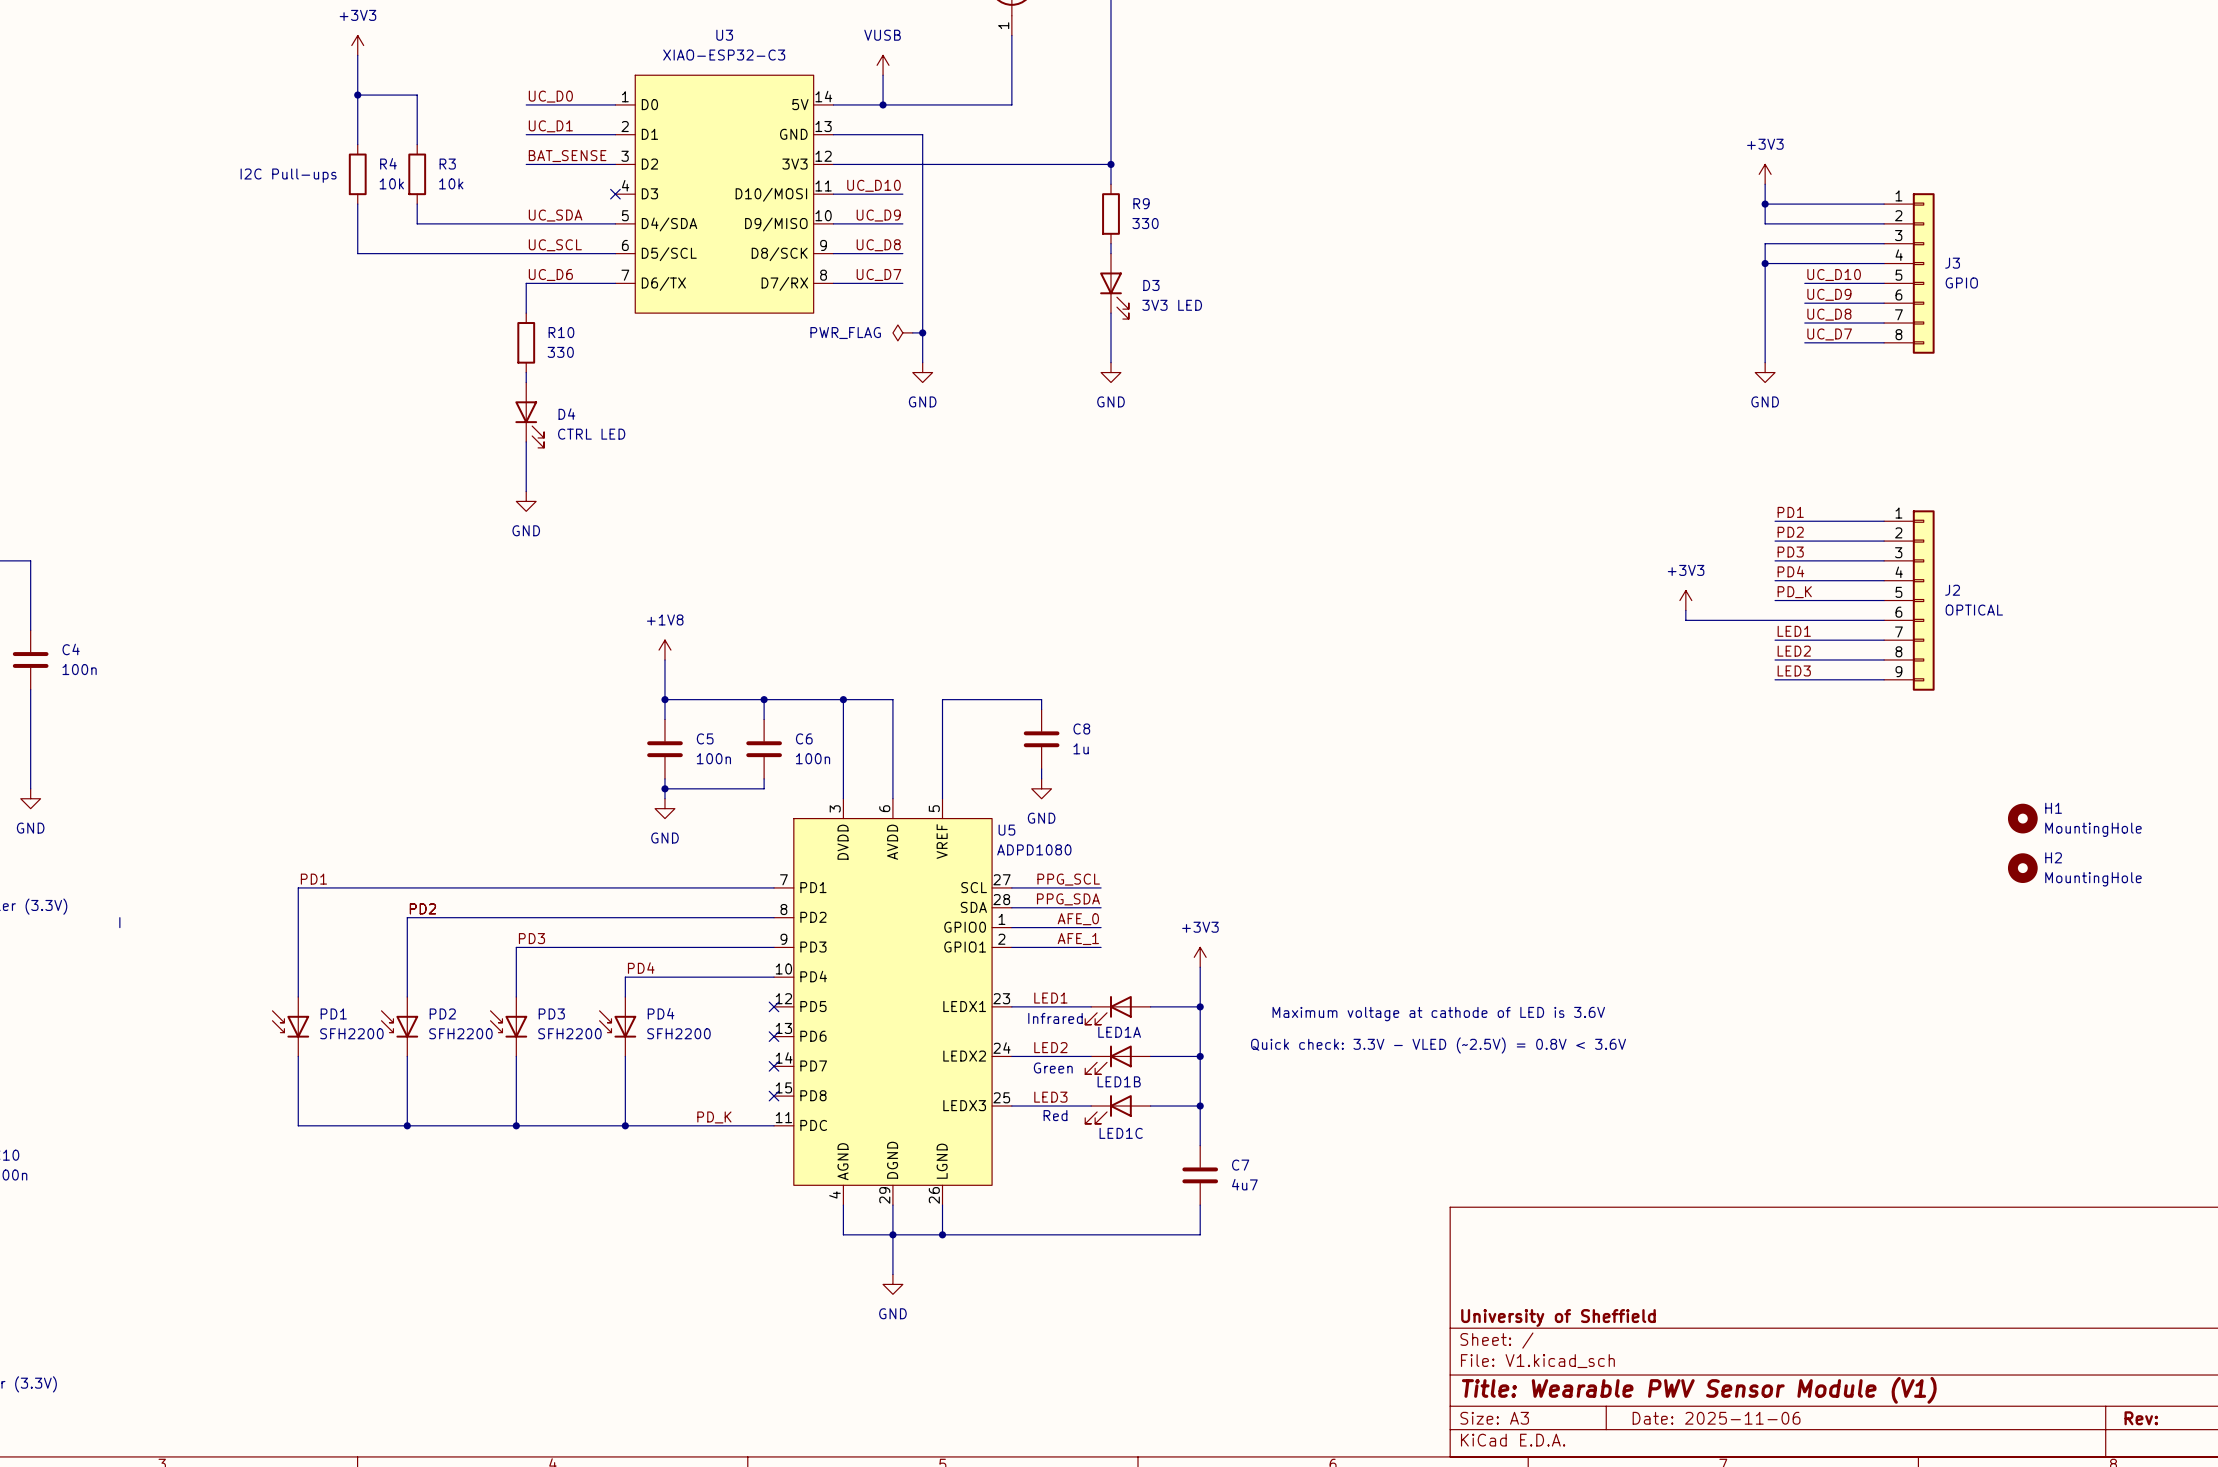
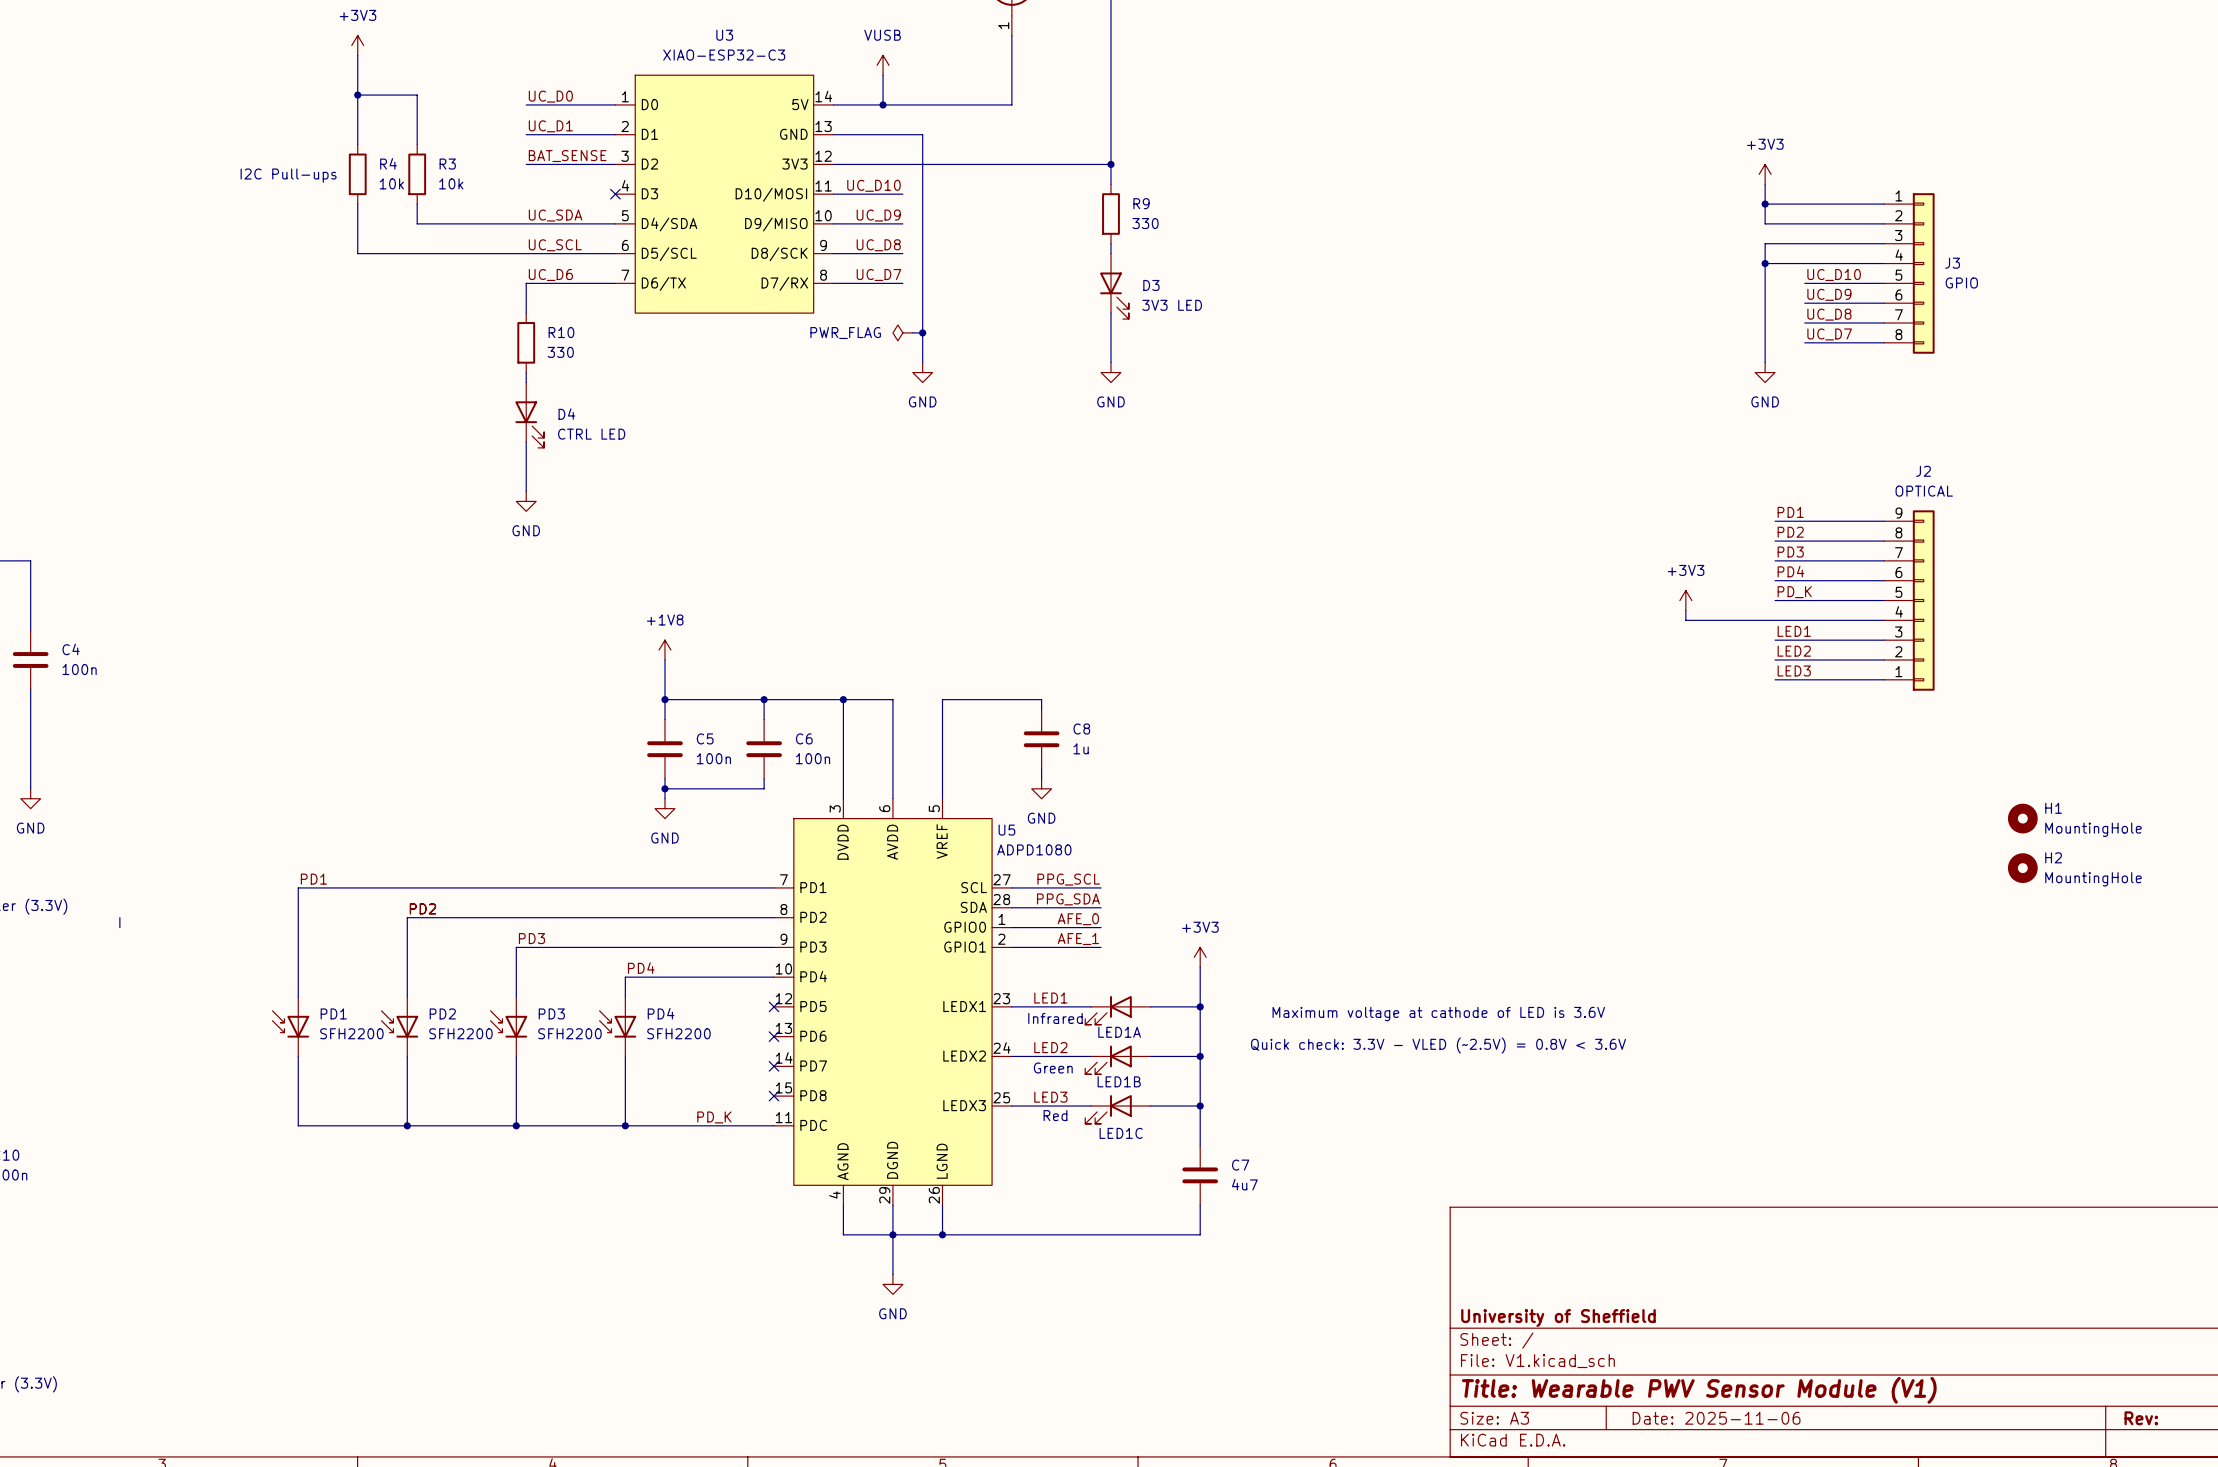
J2 name position: J2 (1952, 590) -> J2 (1923, 471)
J2 flip: as is (1923, 600) -> up-down (1923, 600)
J2 value position: OPTICAL (1974, 610) -> OPTICAL (1924, 491)

